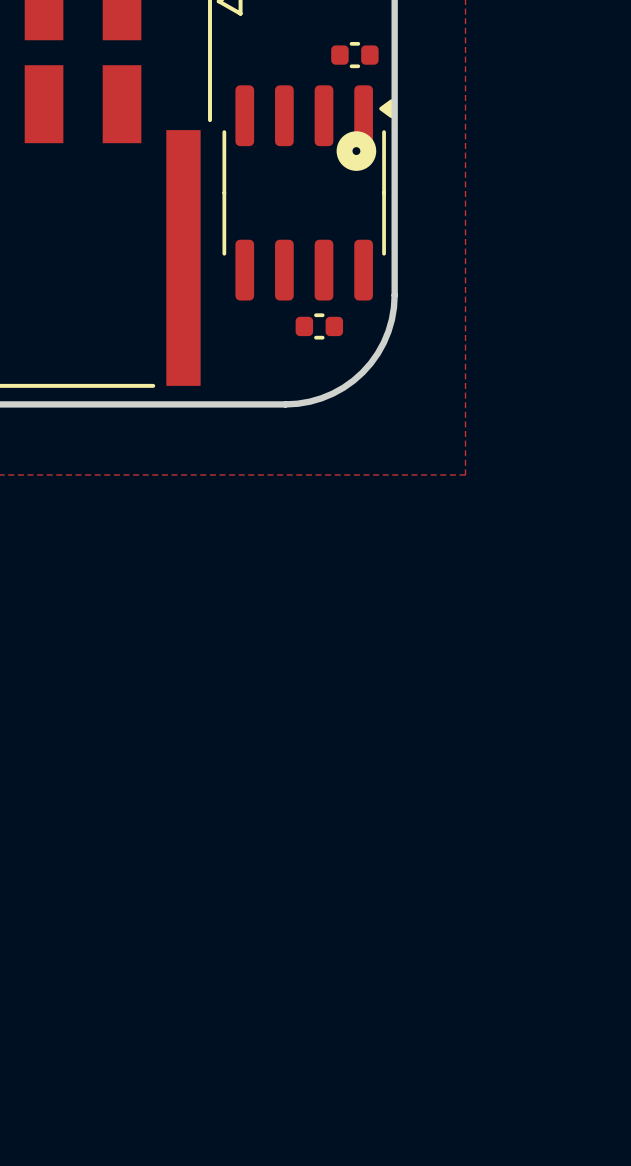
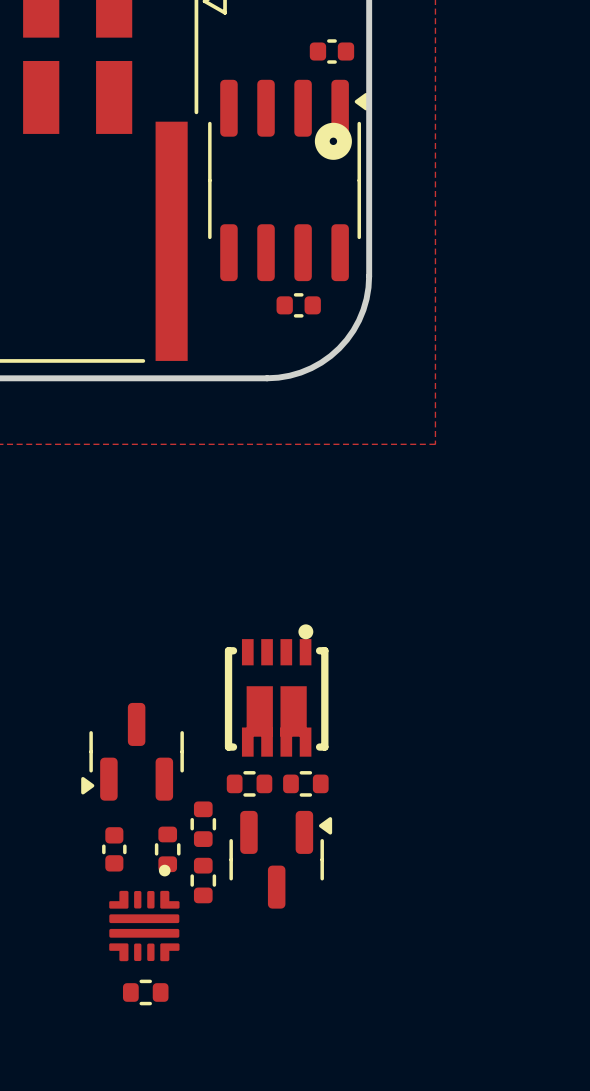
part: none -> (276, 690)
part: none -> (132, 751)
part: none -> (249, 783)
part: none -> (305, 783)
part: none -> (203, 824)
part: none -> (114, 849)
part: none -> (167, 849)
part: none -> (280, 859)
part: none -> (203, 880)
part: none -> (144, 912)
part: none -> (145, 992)

